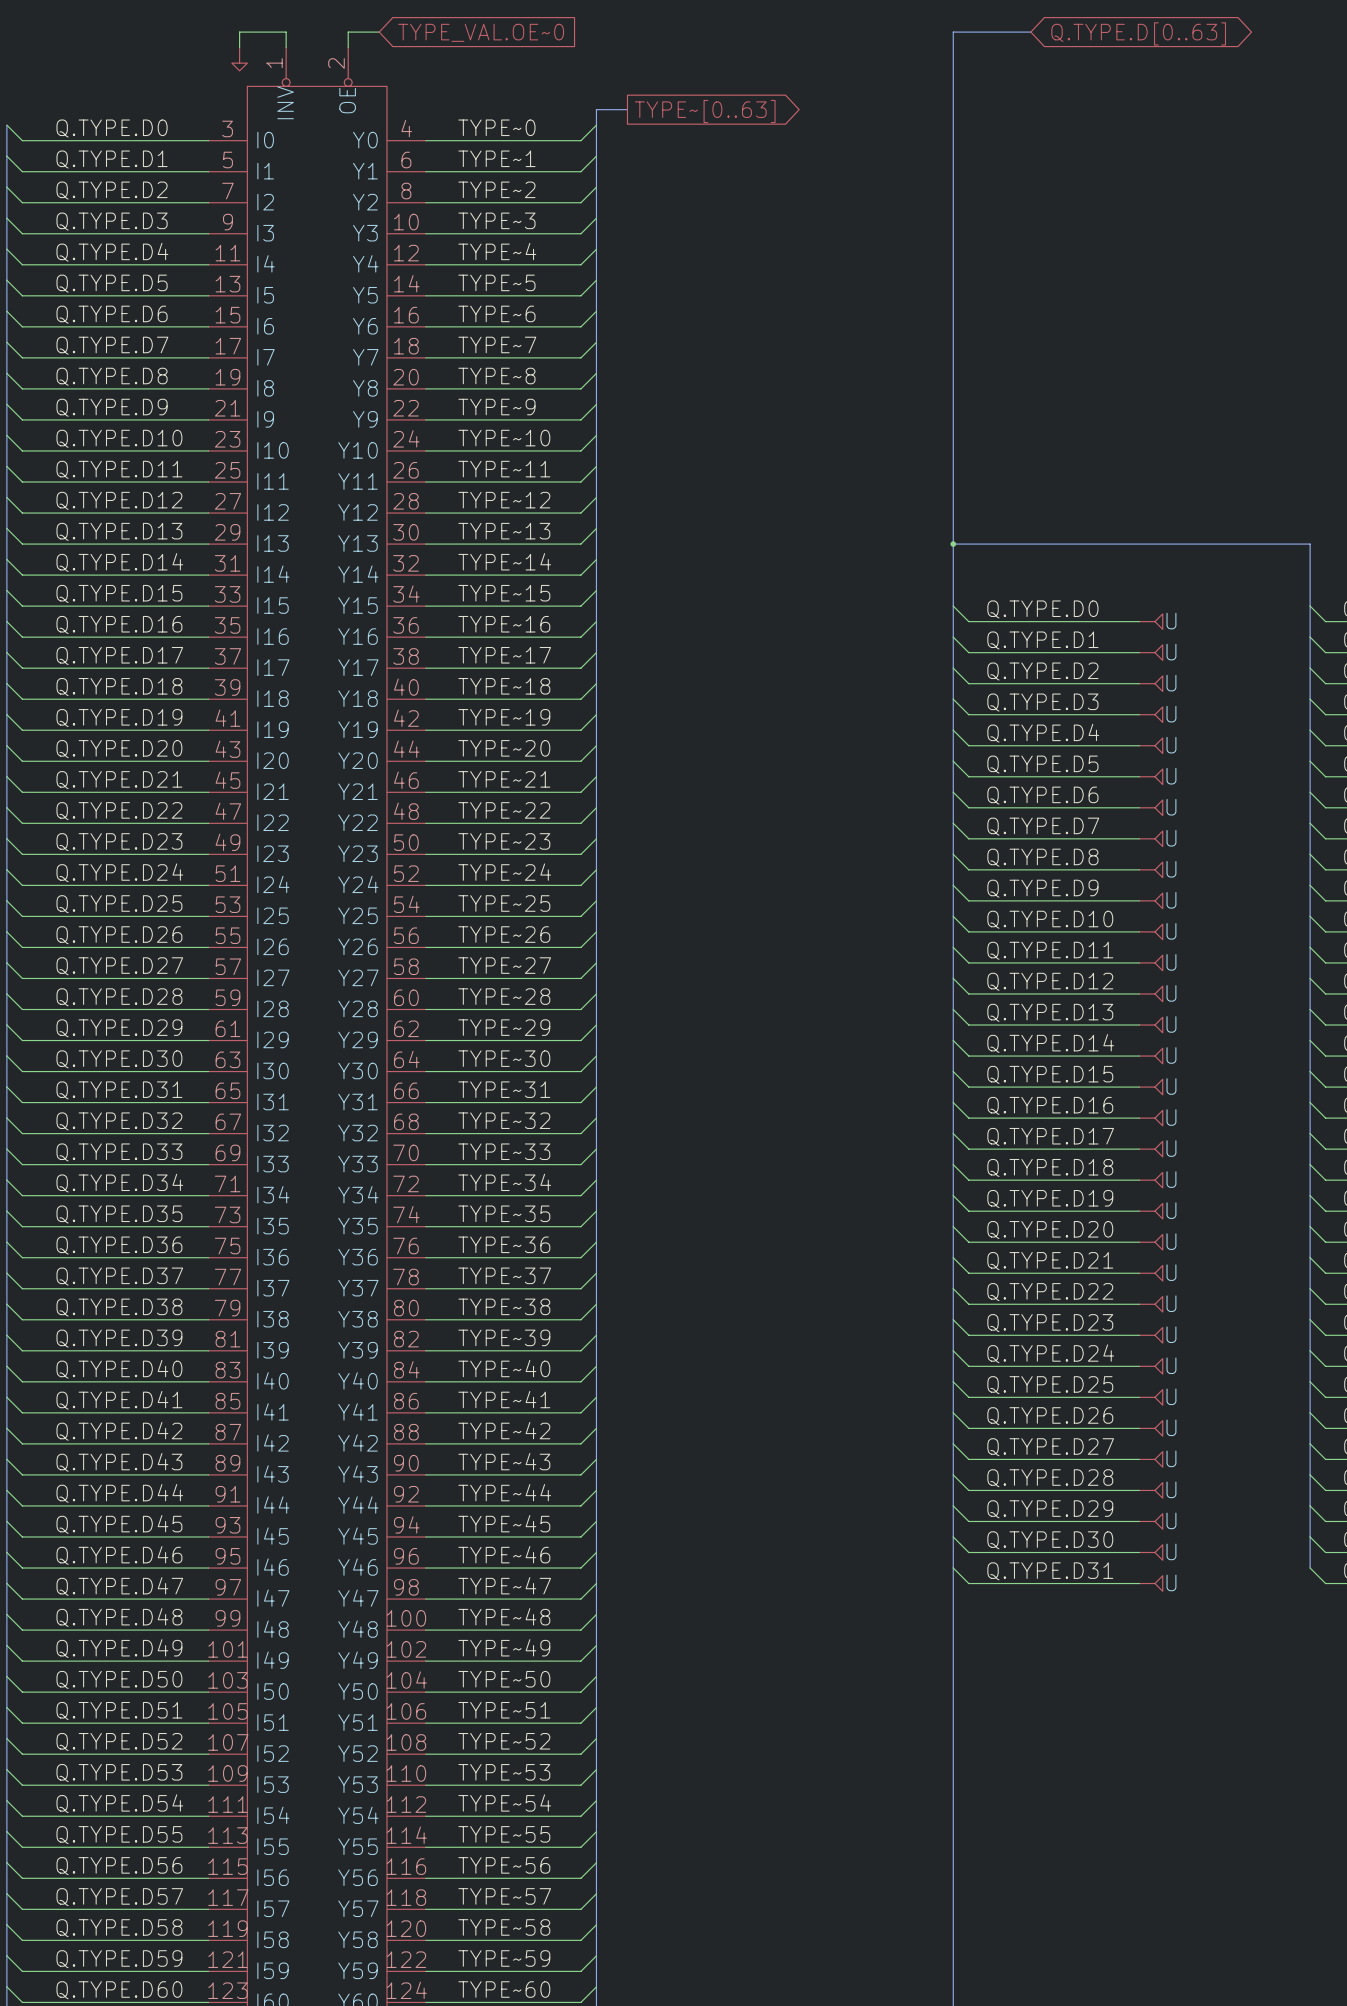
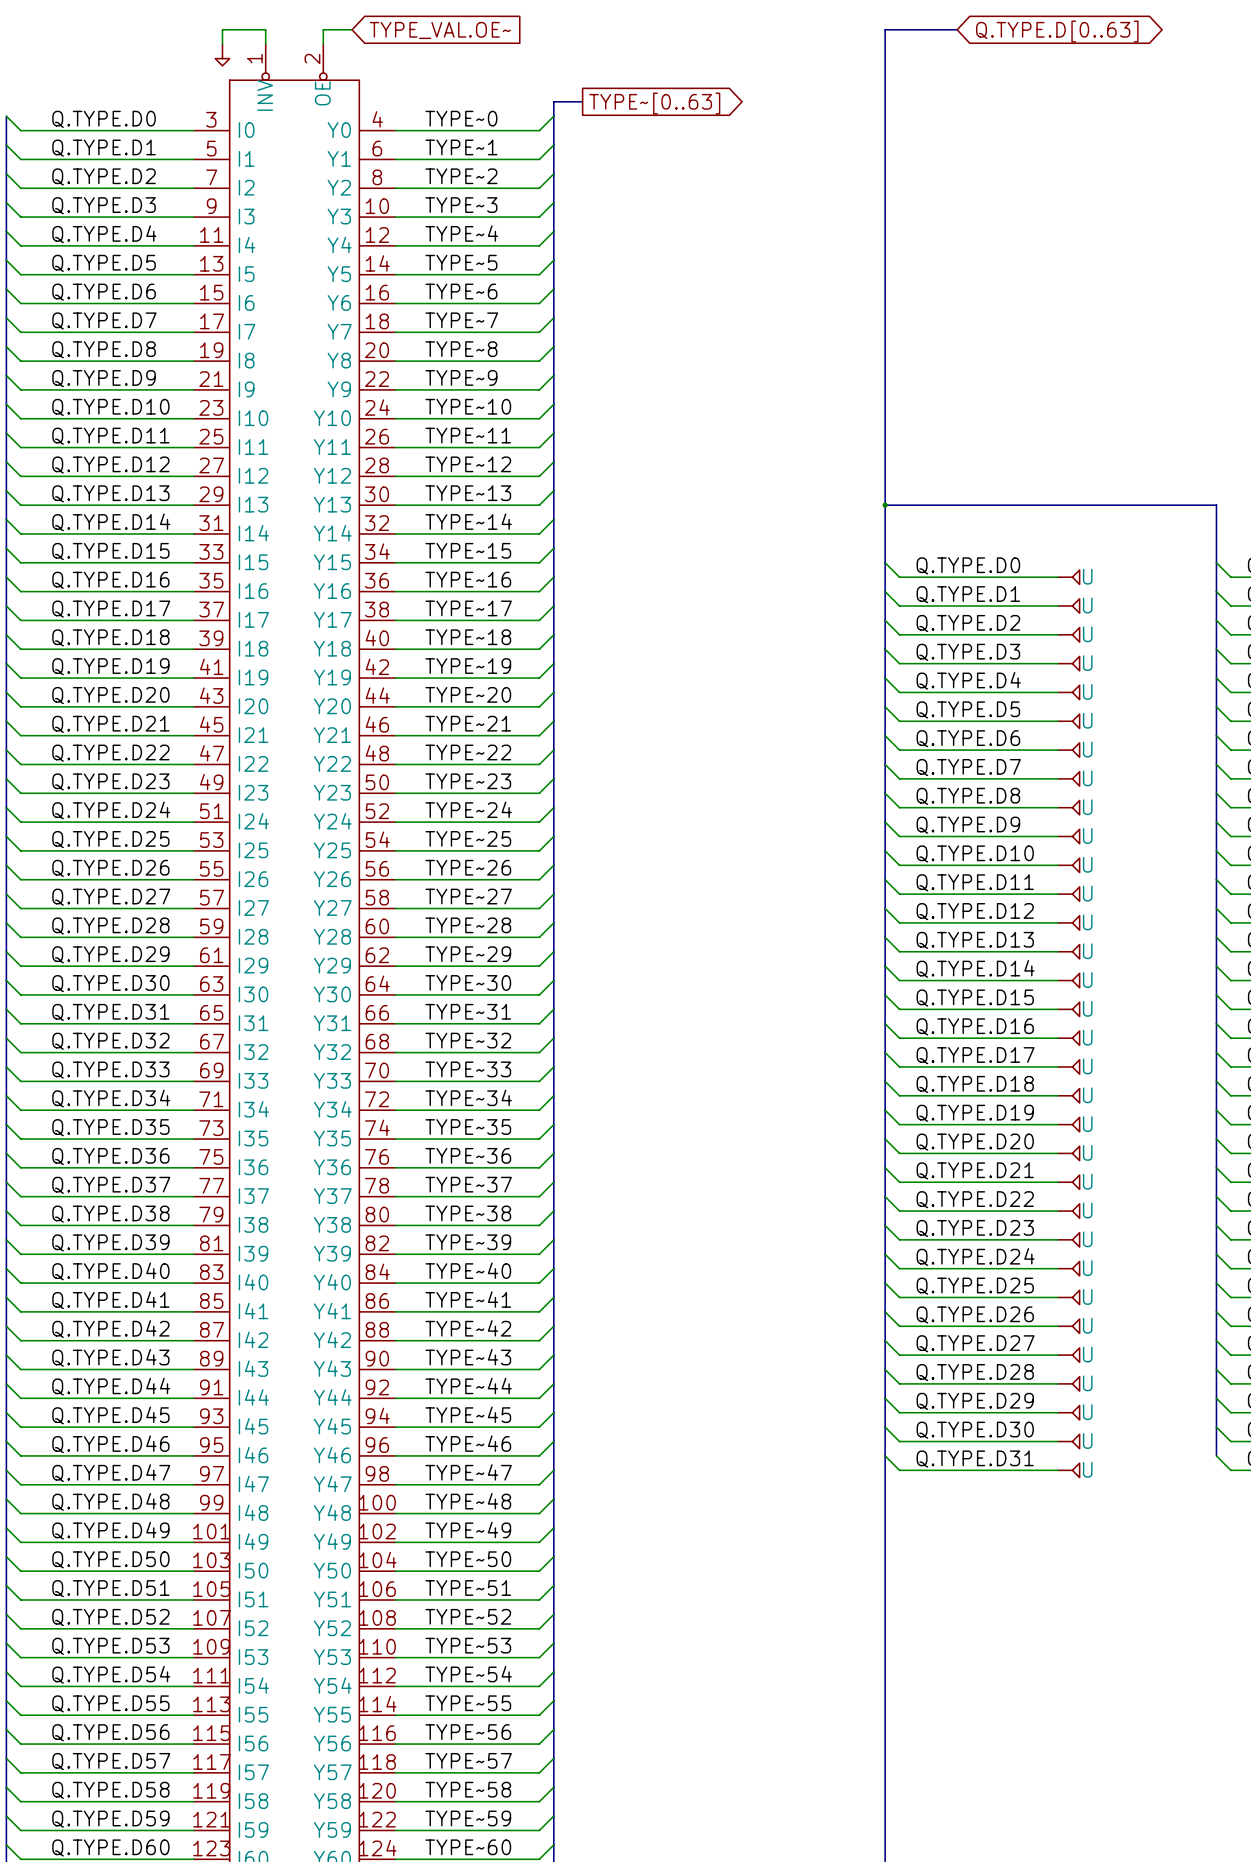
global label: TYPE_VAL.OE~0 (481, 32) -> TYPE_VAL.OE~ (440, 30)

